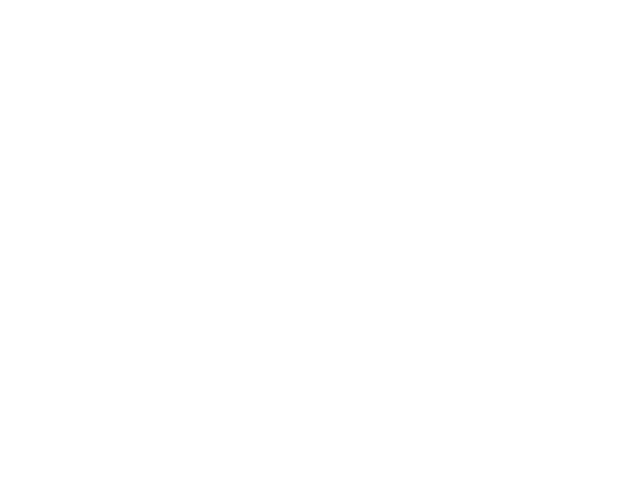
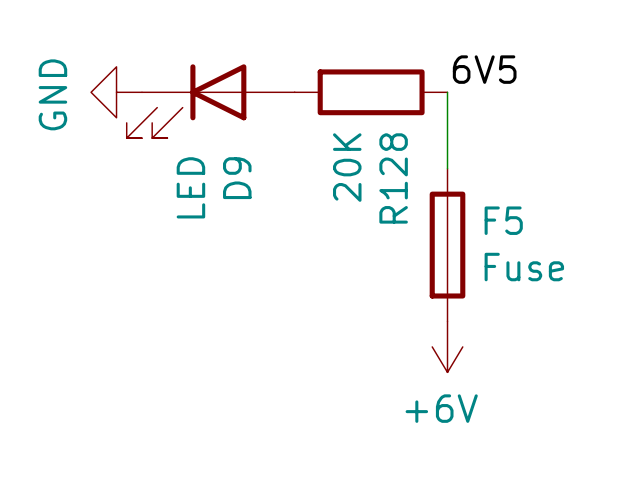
label: none -> 6V5 (484, 69)
power symbol: none -> GND (116, 92)
R128: none -> 20K (371, 92)
wire: none -> (447, 92) (447, 168)
D9: none -> LED (210, 101)
F5: none -> Fuse (447, 245)
power symbol: none -> +6V (447, 346)

